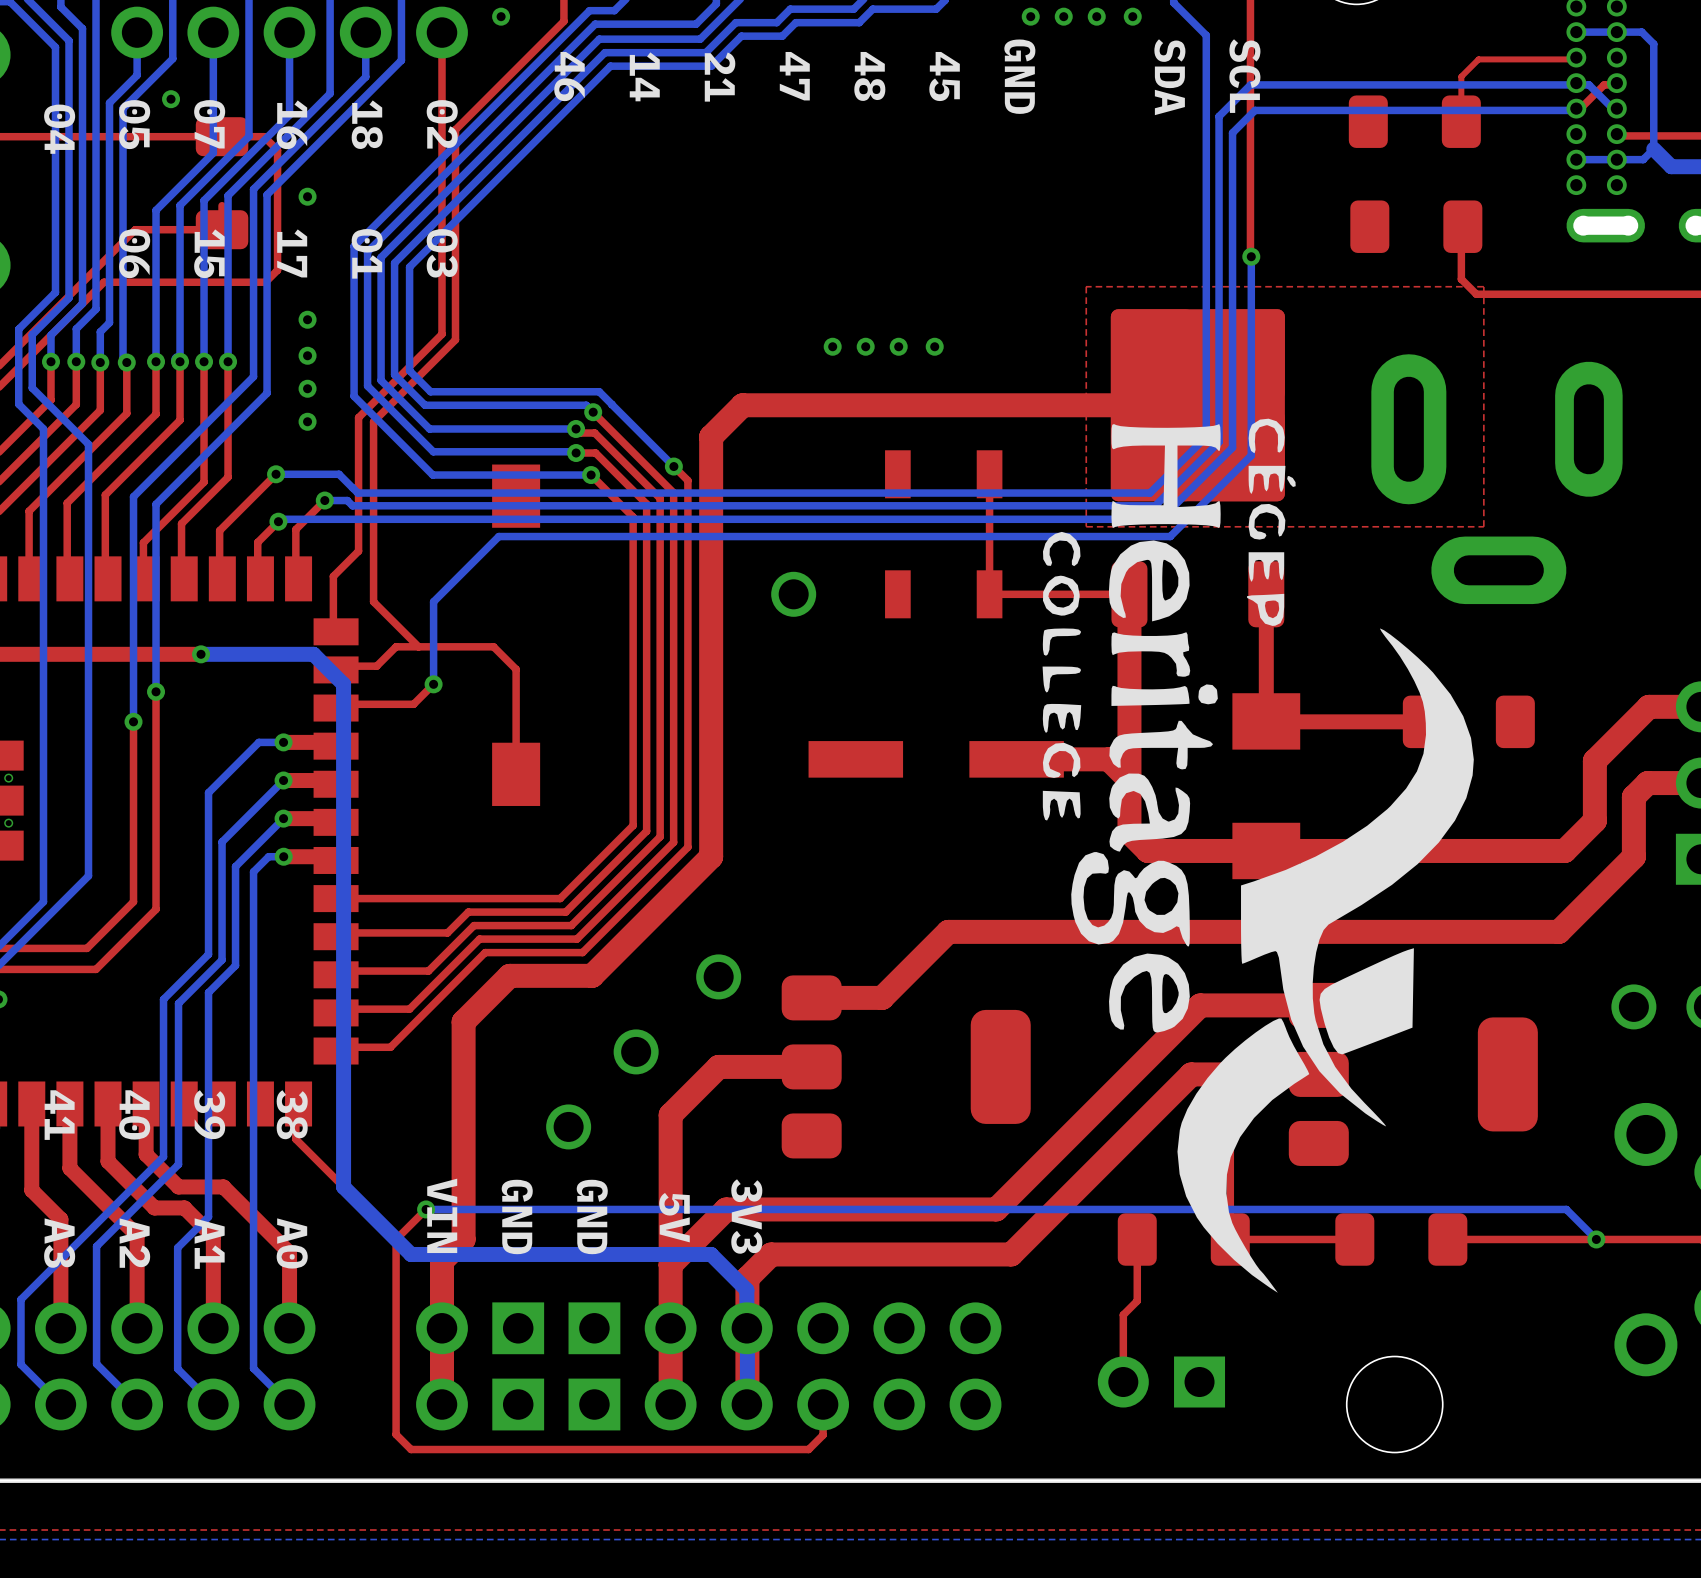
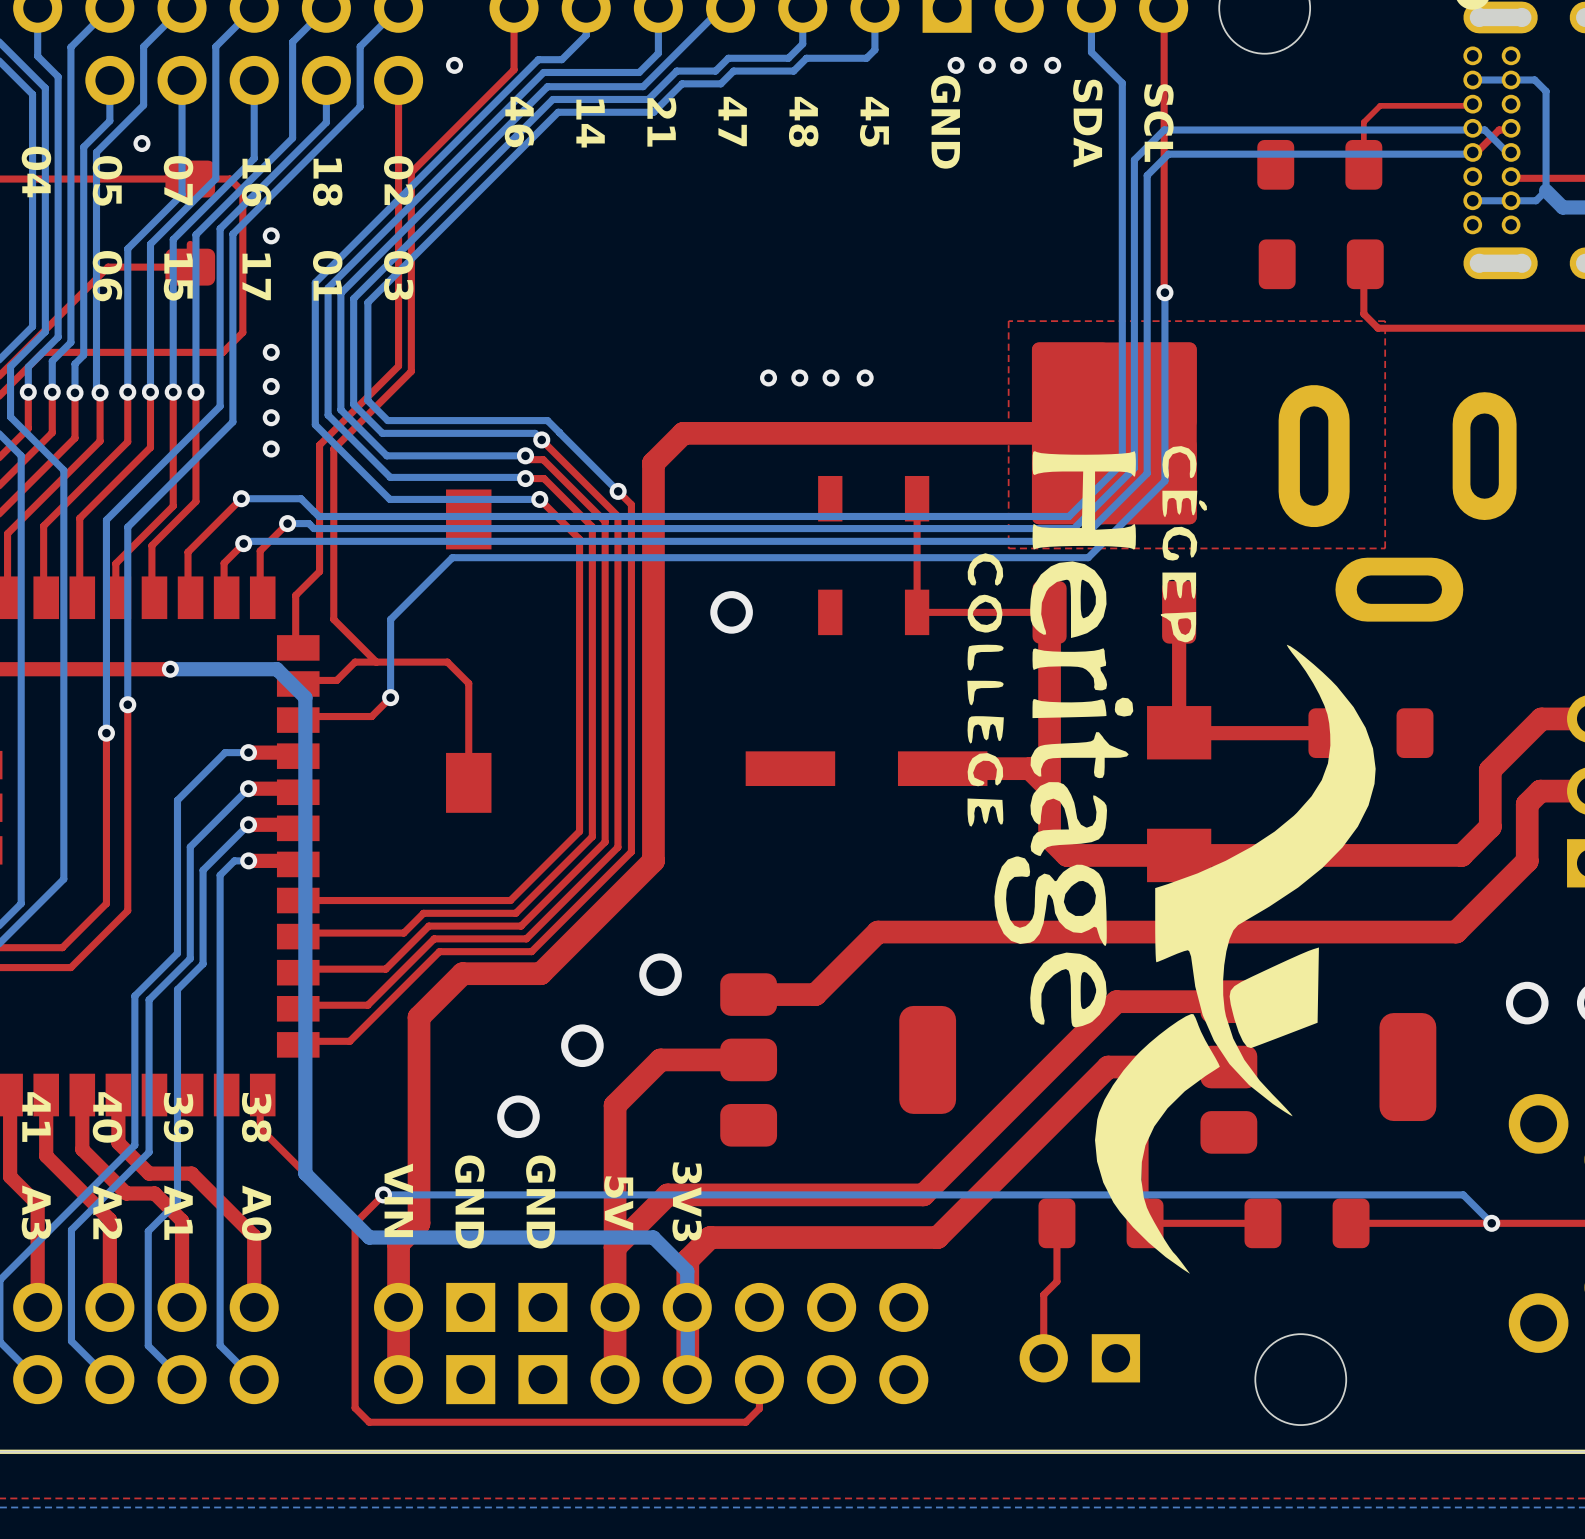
top track: (277, 270) (265, 282) (103, 282) (66, 319) -> (242, 305) (242, 332) (222, 352) (42, 352)

